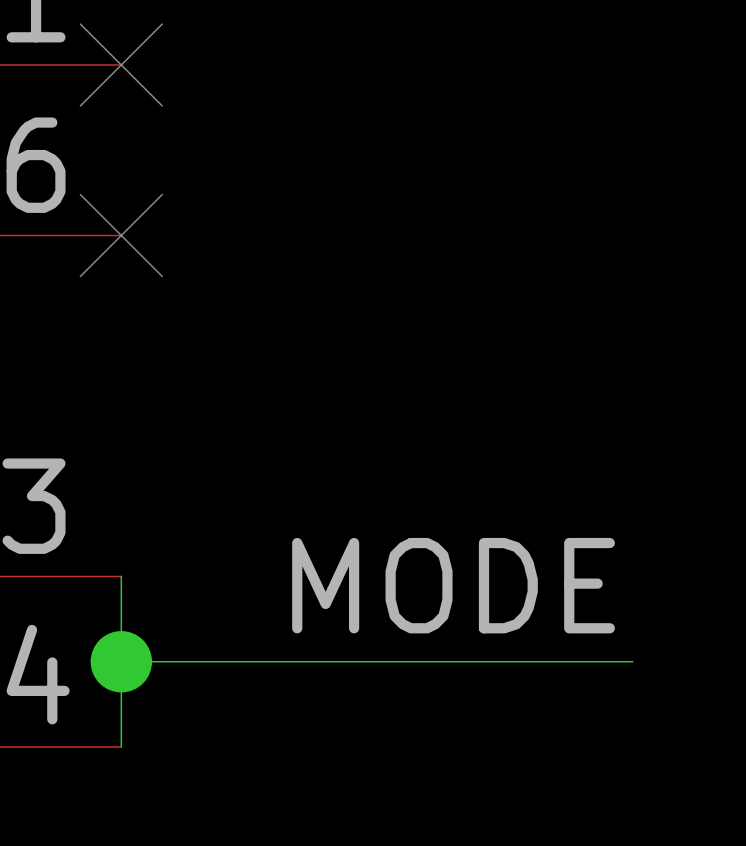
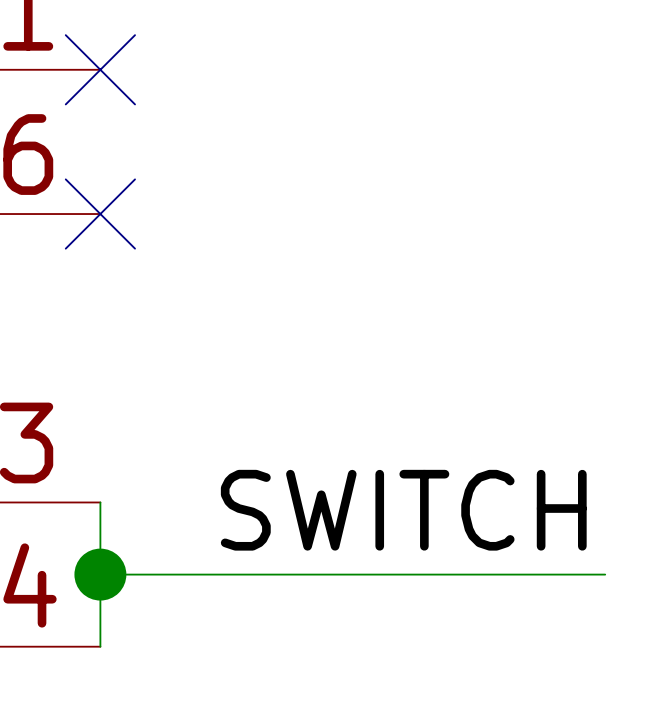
label: MODE (453, 585) -> none
label: none -> SWITCH (403, 510)
wire: none -> (533, 574) (605, 574)

